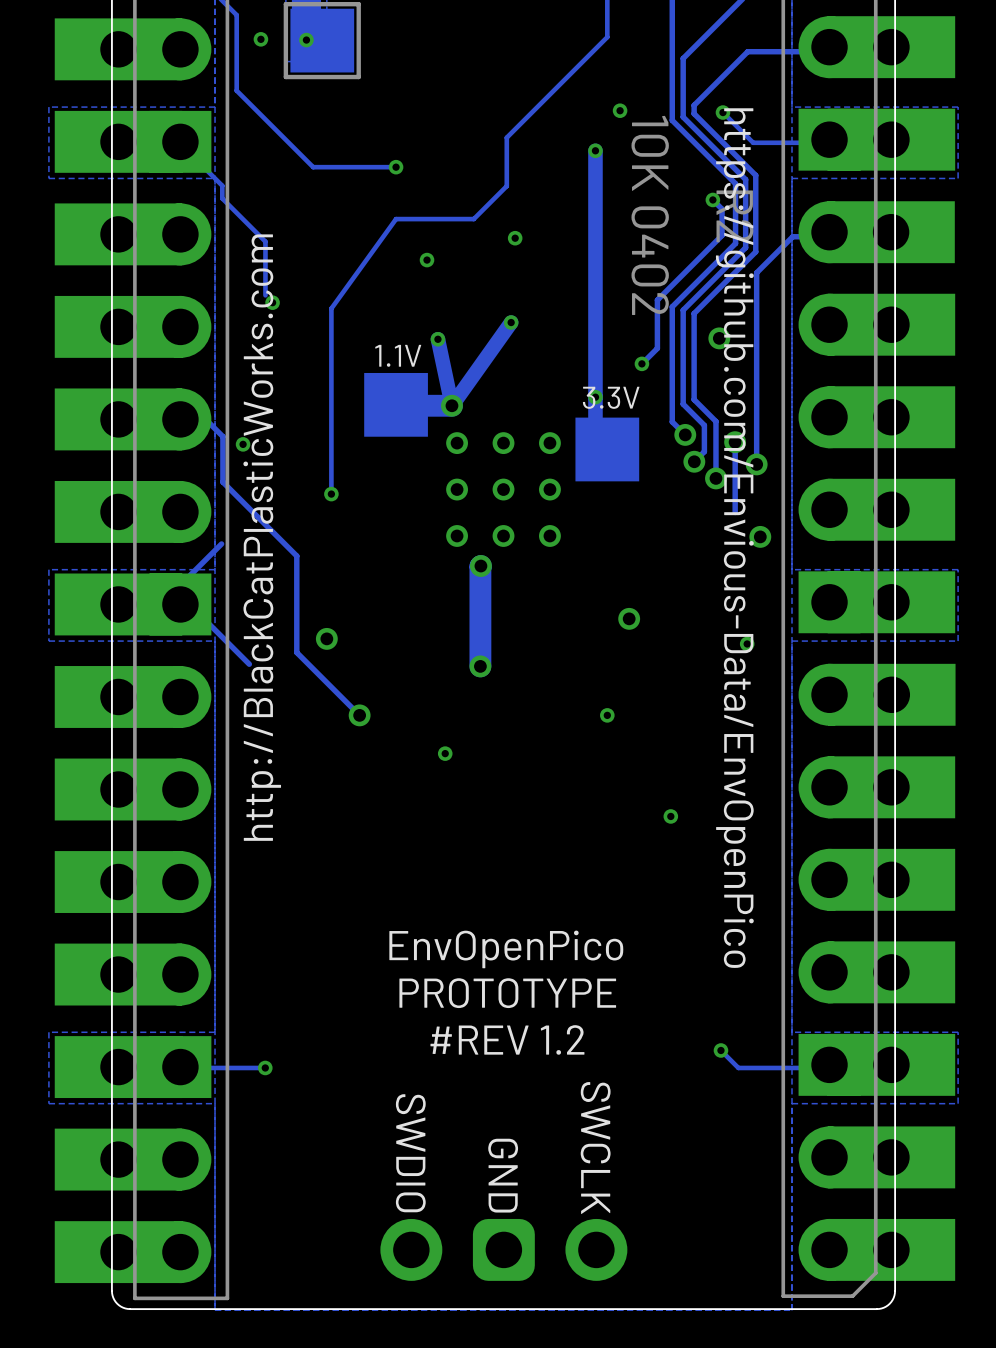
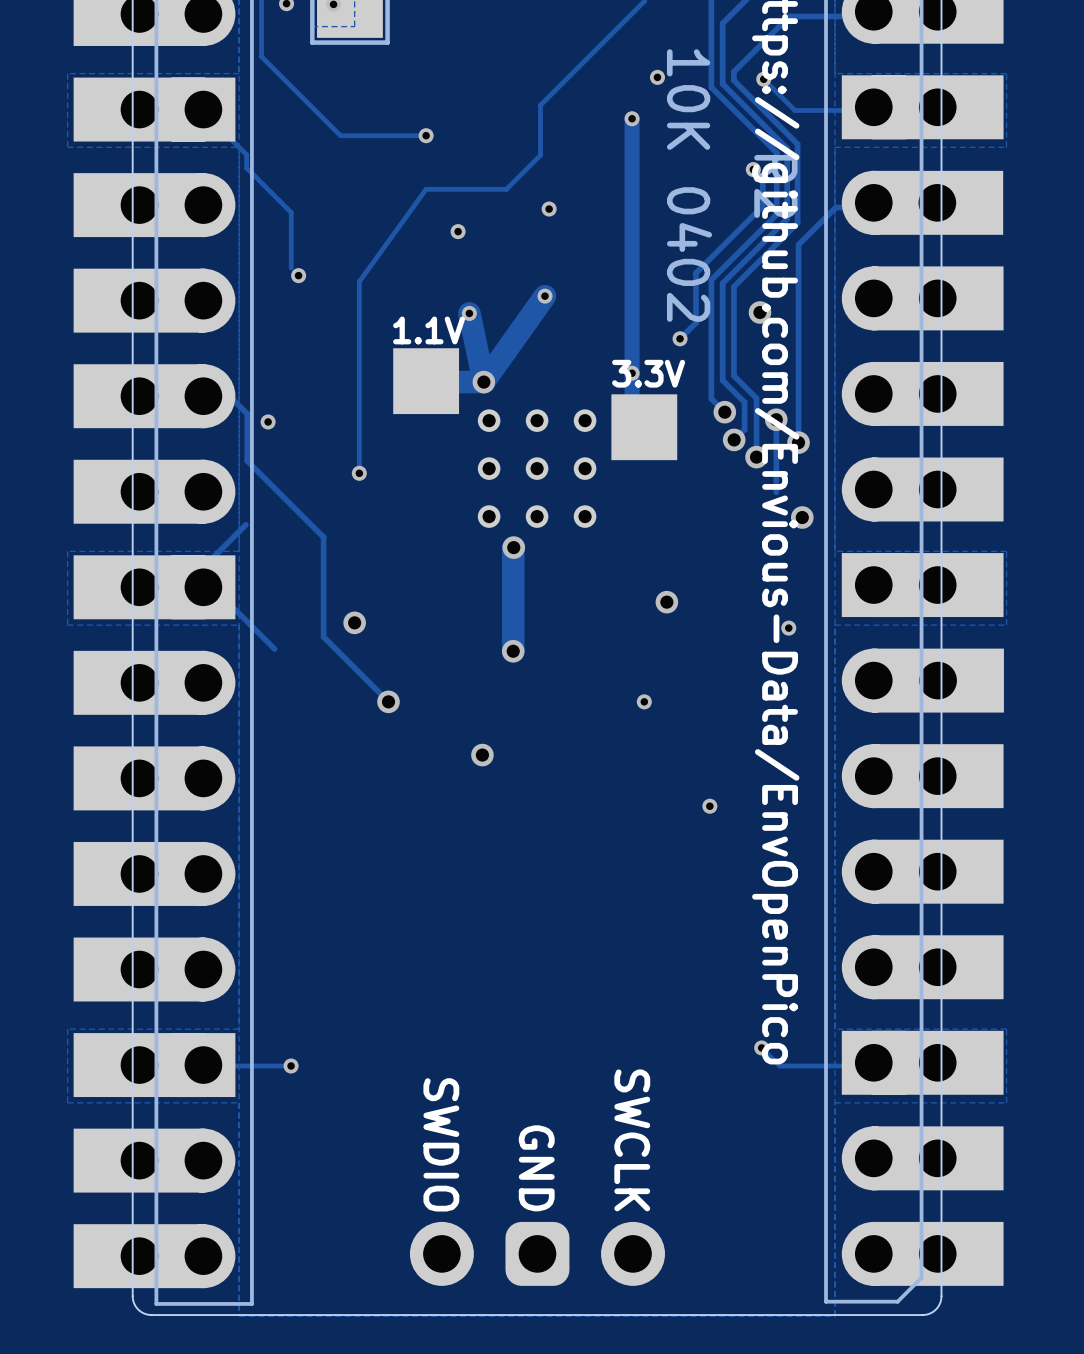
track width: thin (511, 322) (451, 405) (437, 339) -> thick (544, 296) (483, 382) (469, 313)
text: http://BlackCatPlasticWorks.com (262, 537) -> none
via size: [437, 746, 453, 761] -> [471, 743, 494, 767]
text: EnvOpenPico (506, 949) -> none
text: PROTOTYPE (507, 993) -> none
text: #REV 1.2 (507, 1039) -> none

